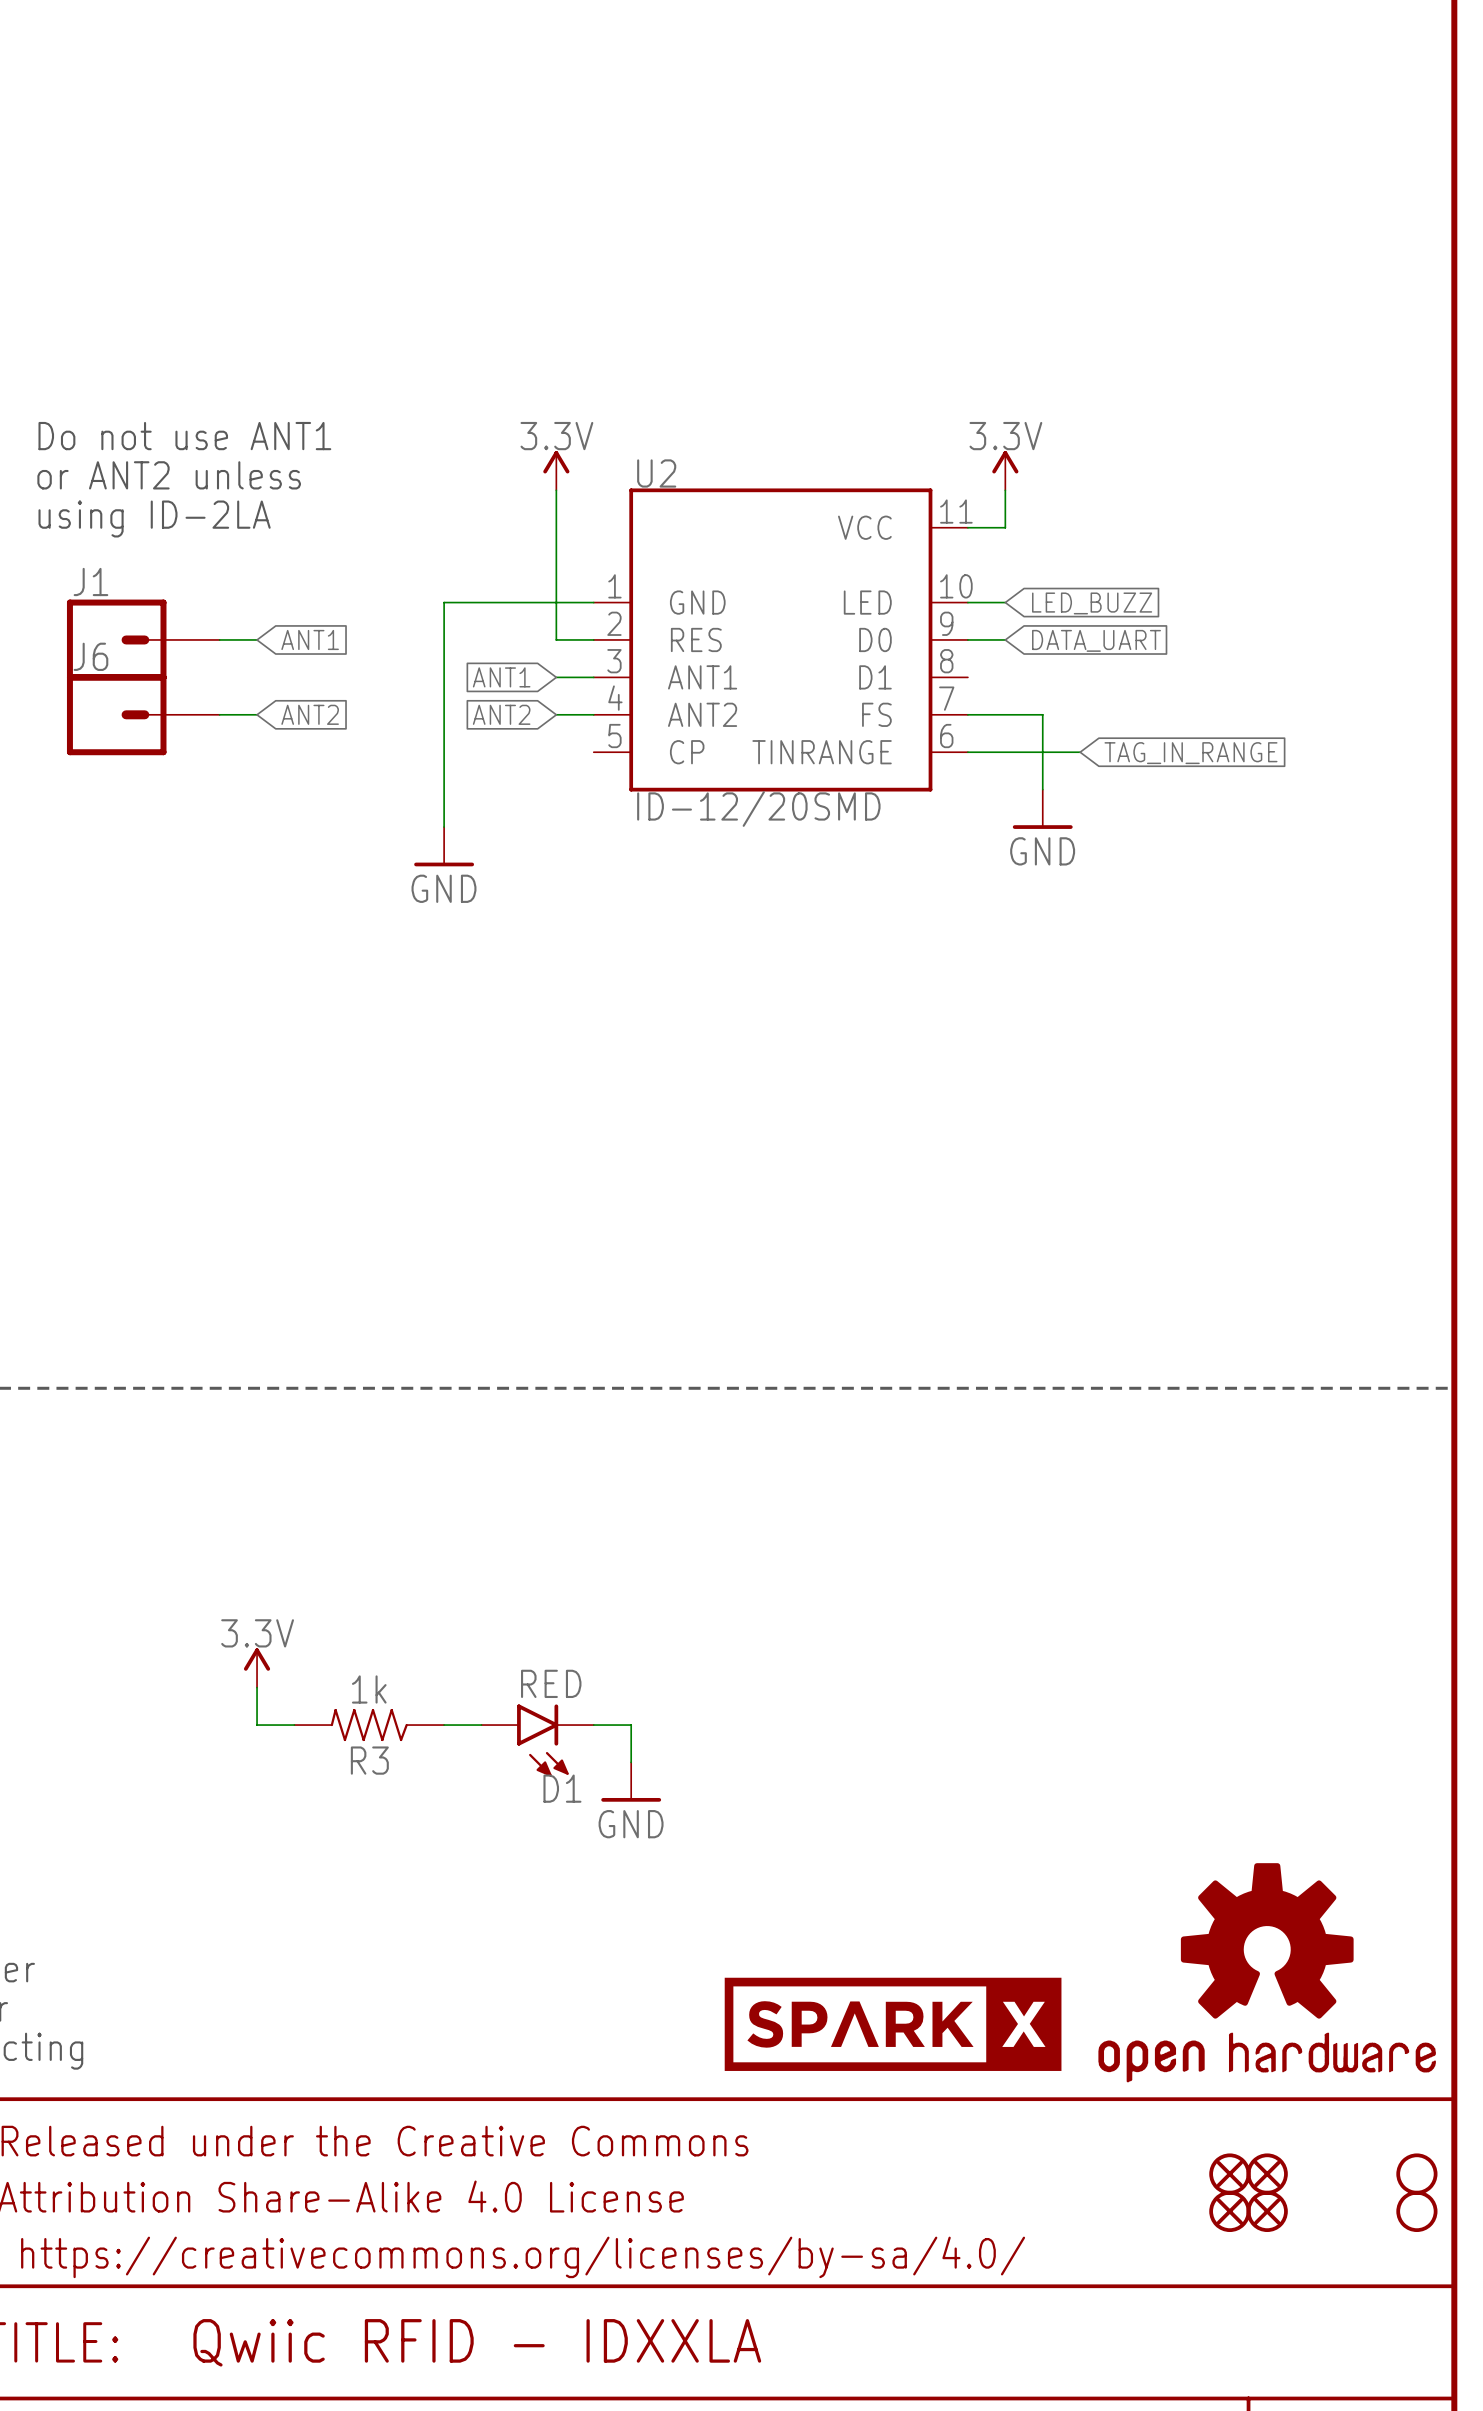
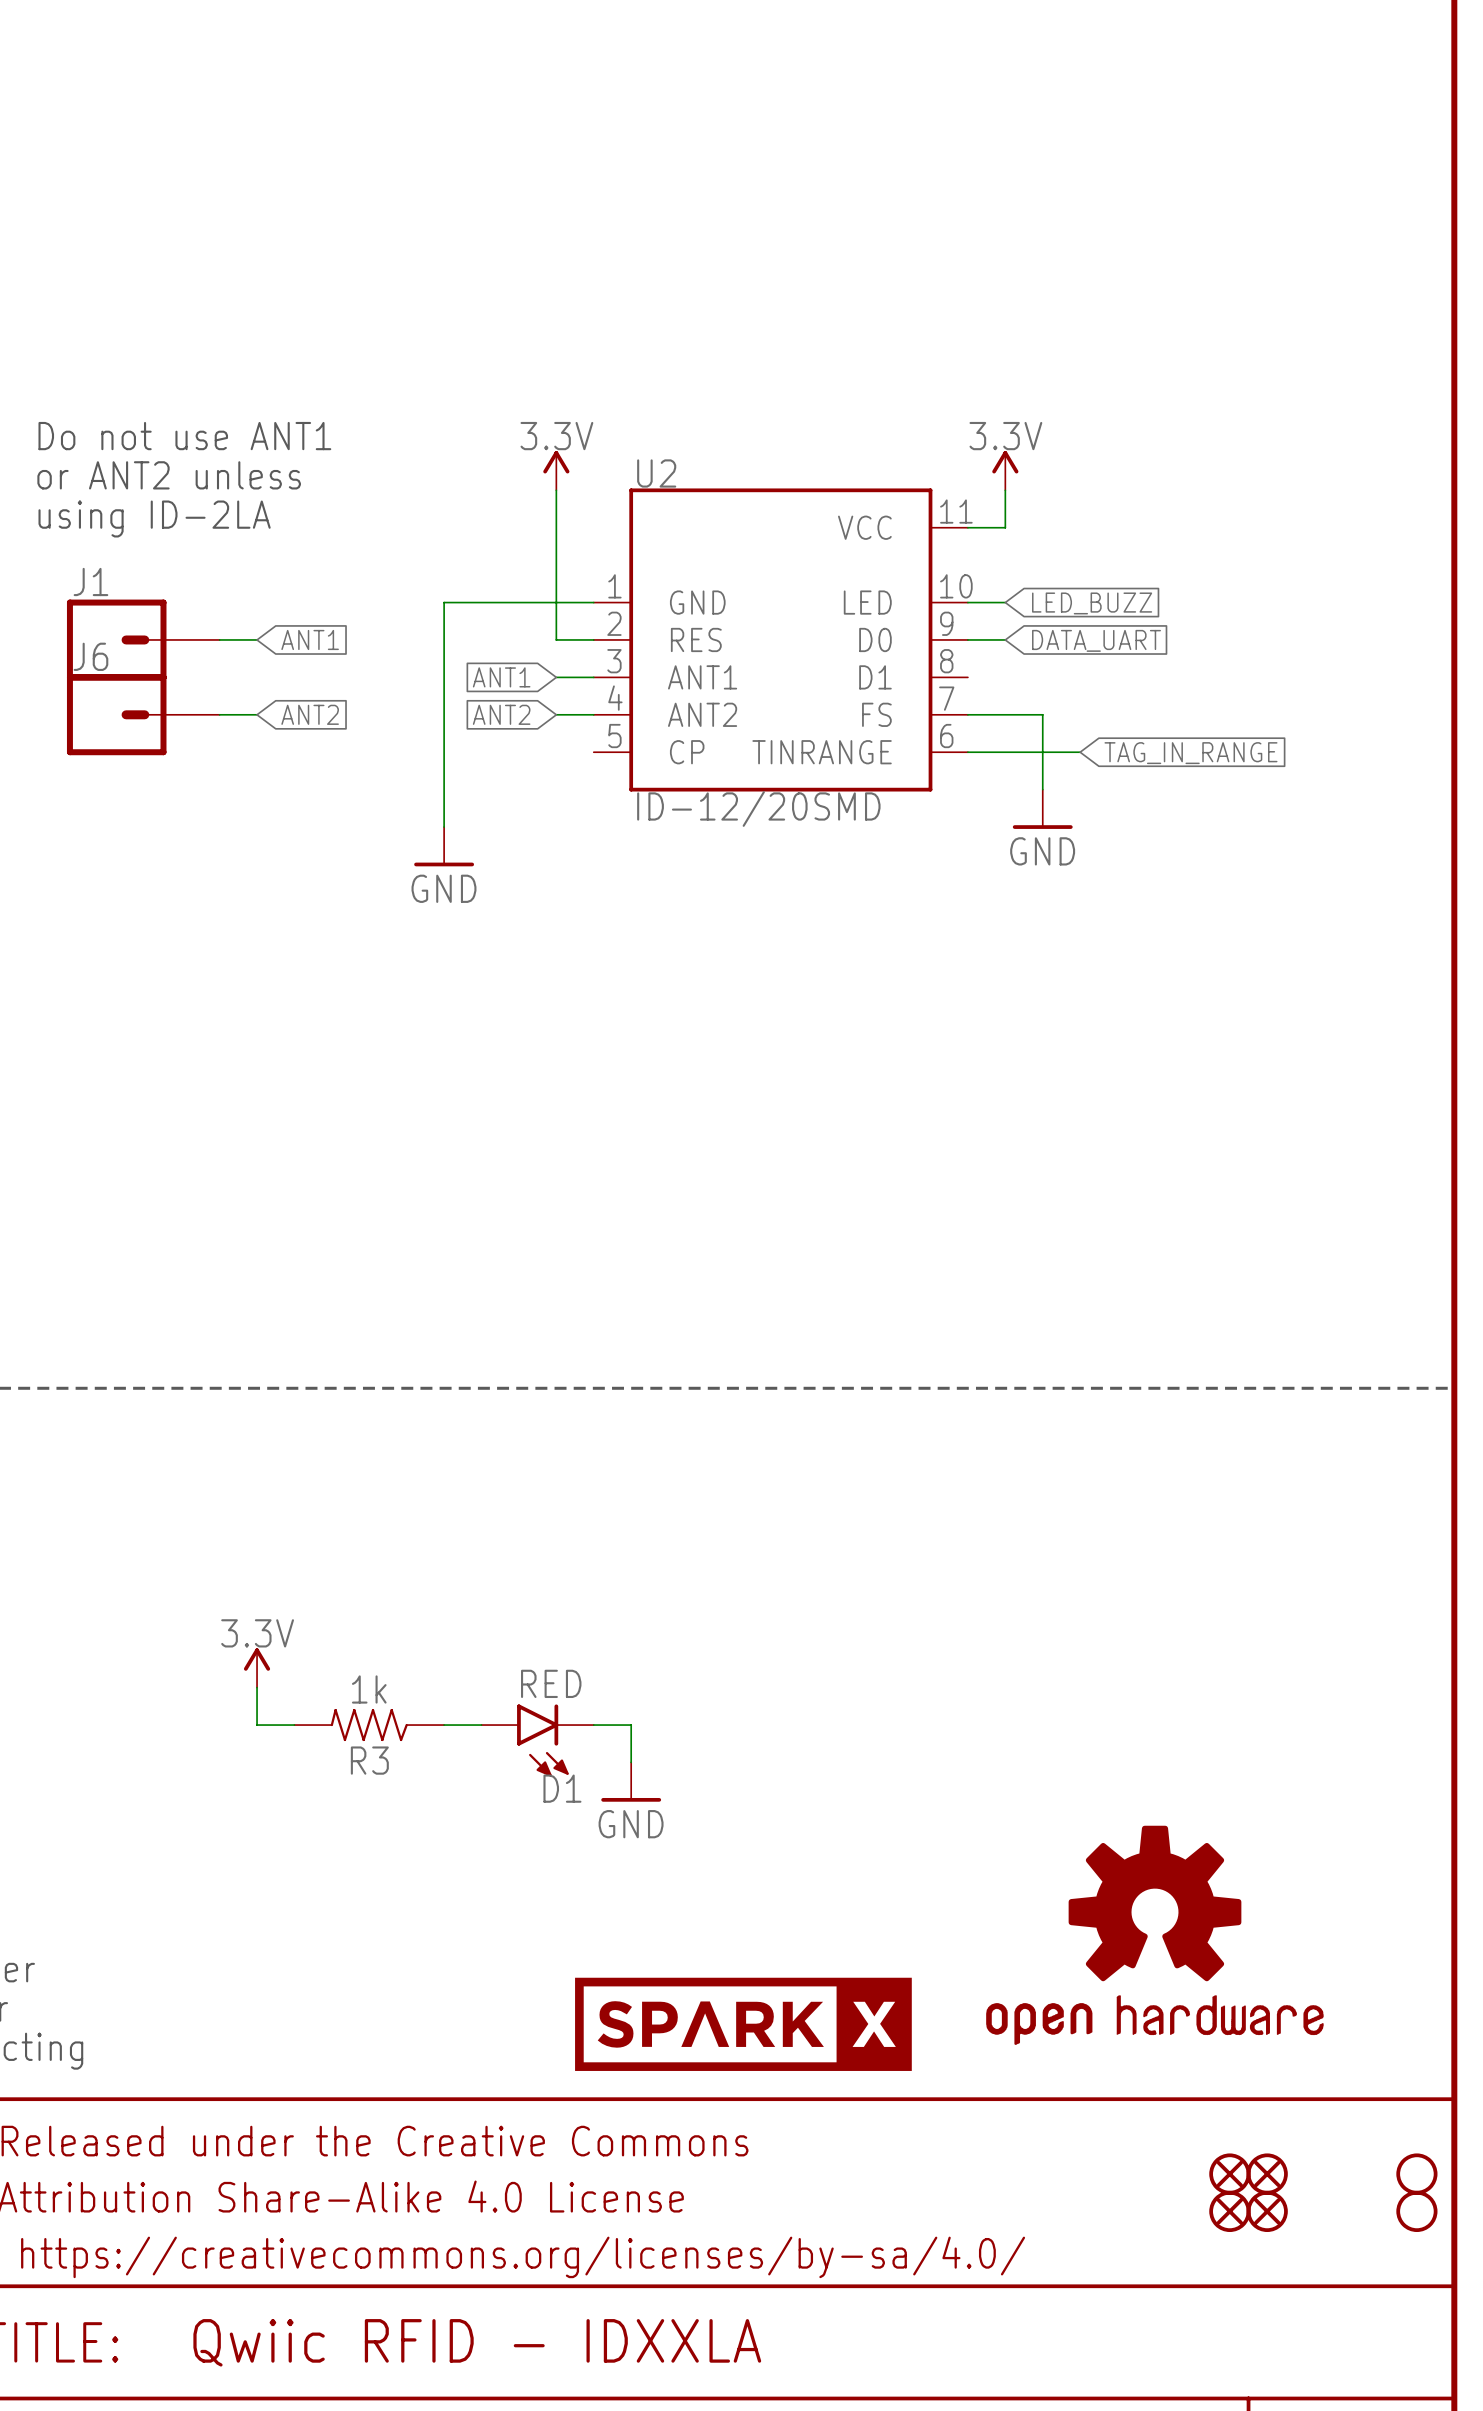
part position: (1267, 1972) -> (1154, 1935)
part position: (893, 2024) -> (743, 2024)

